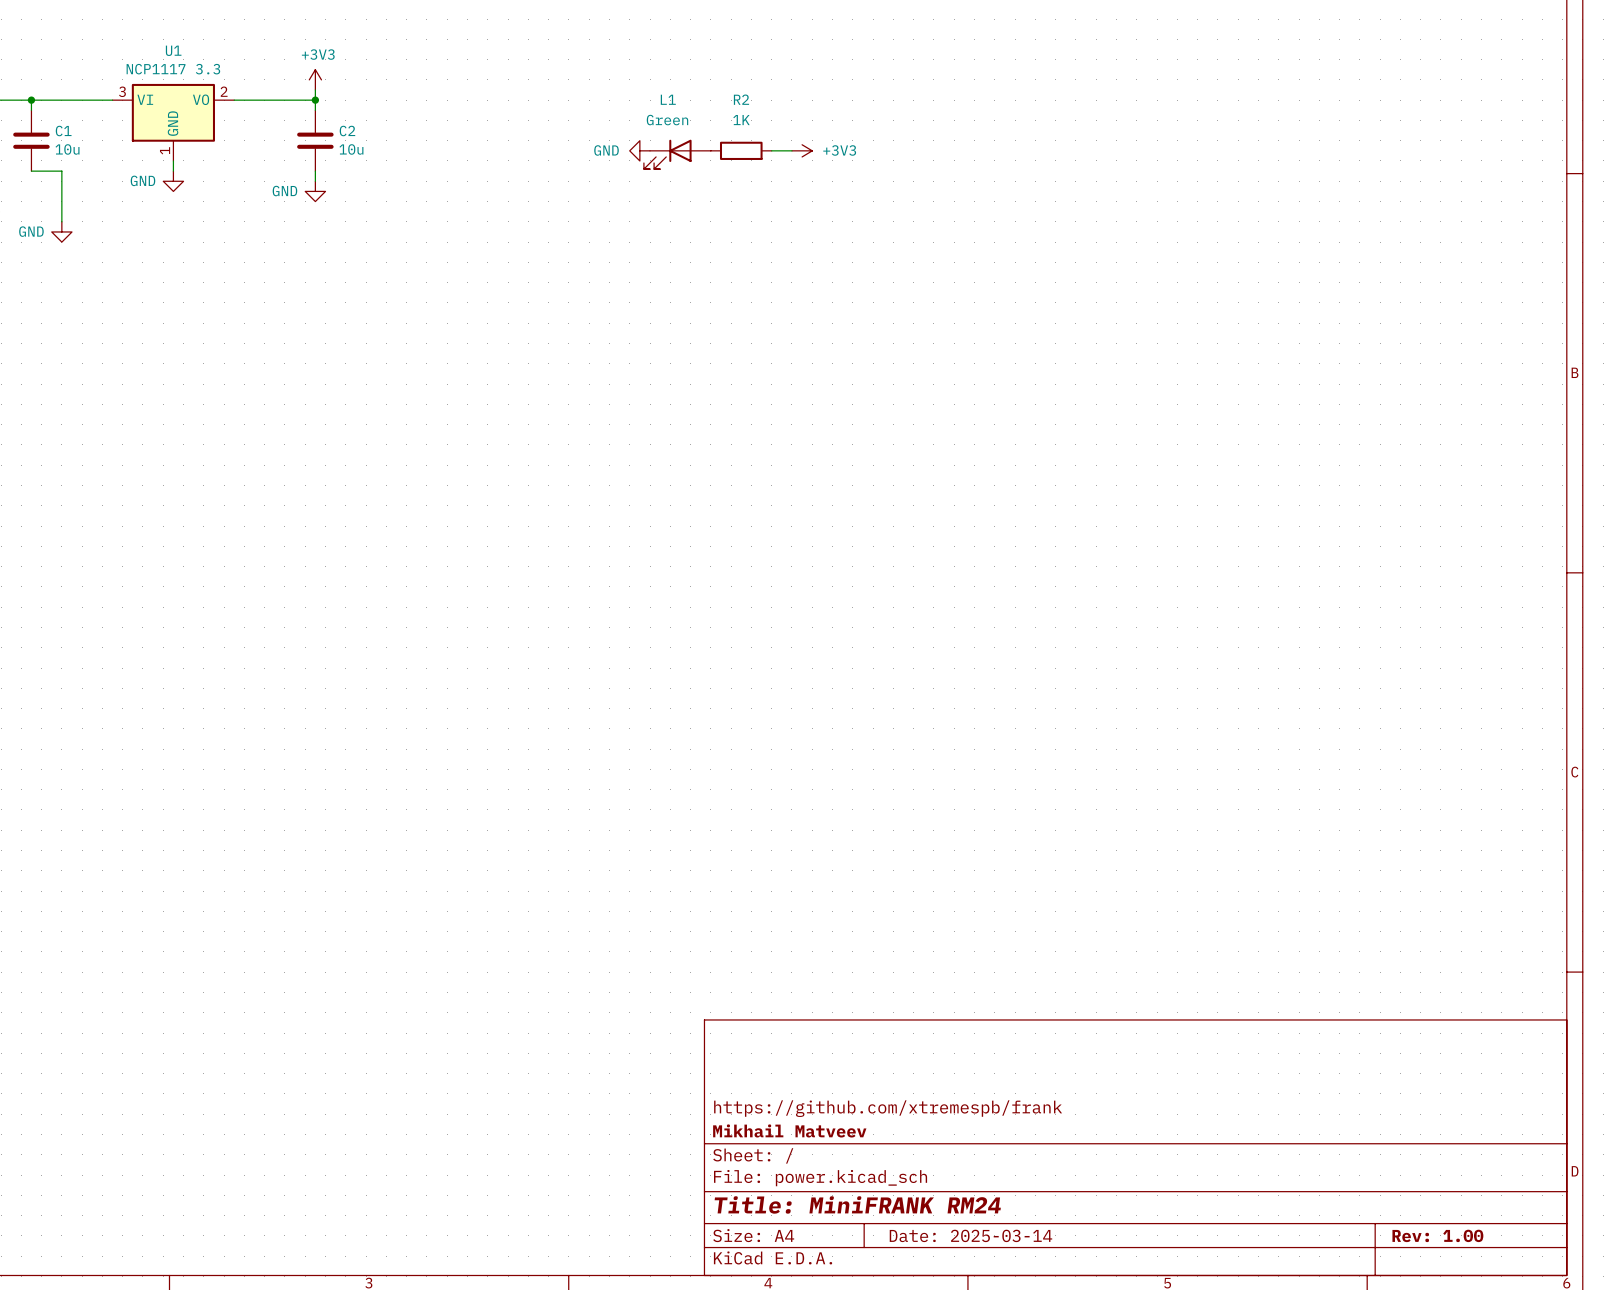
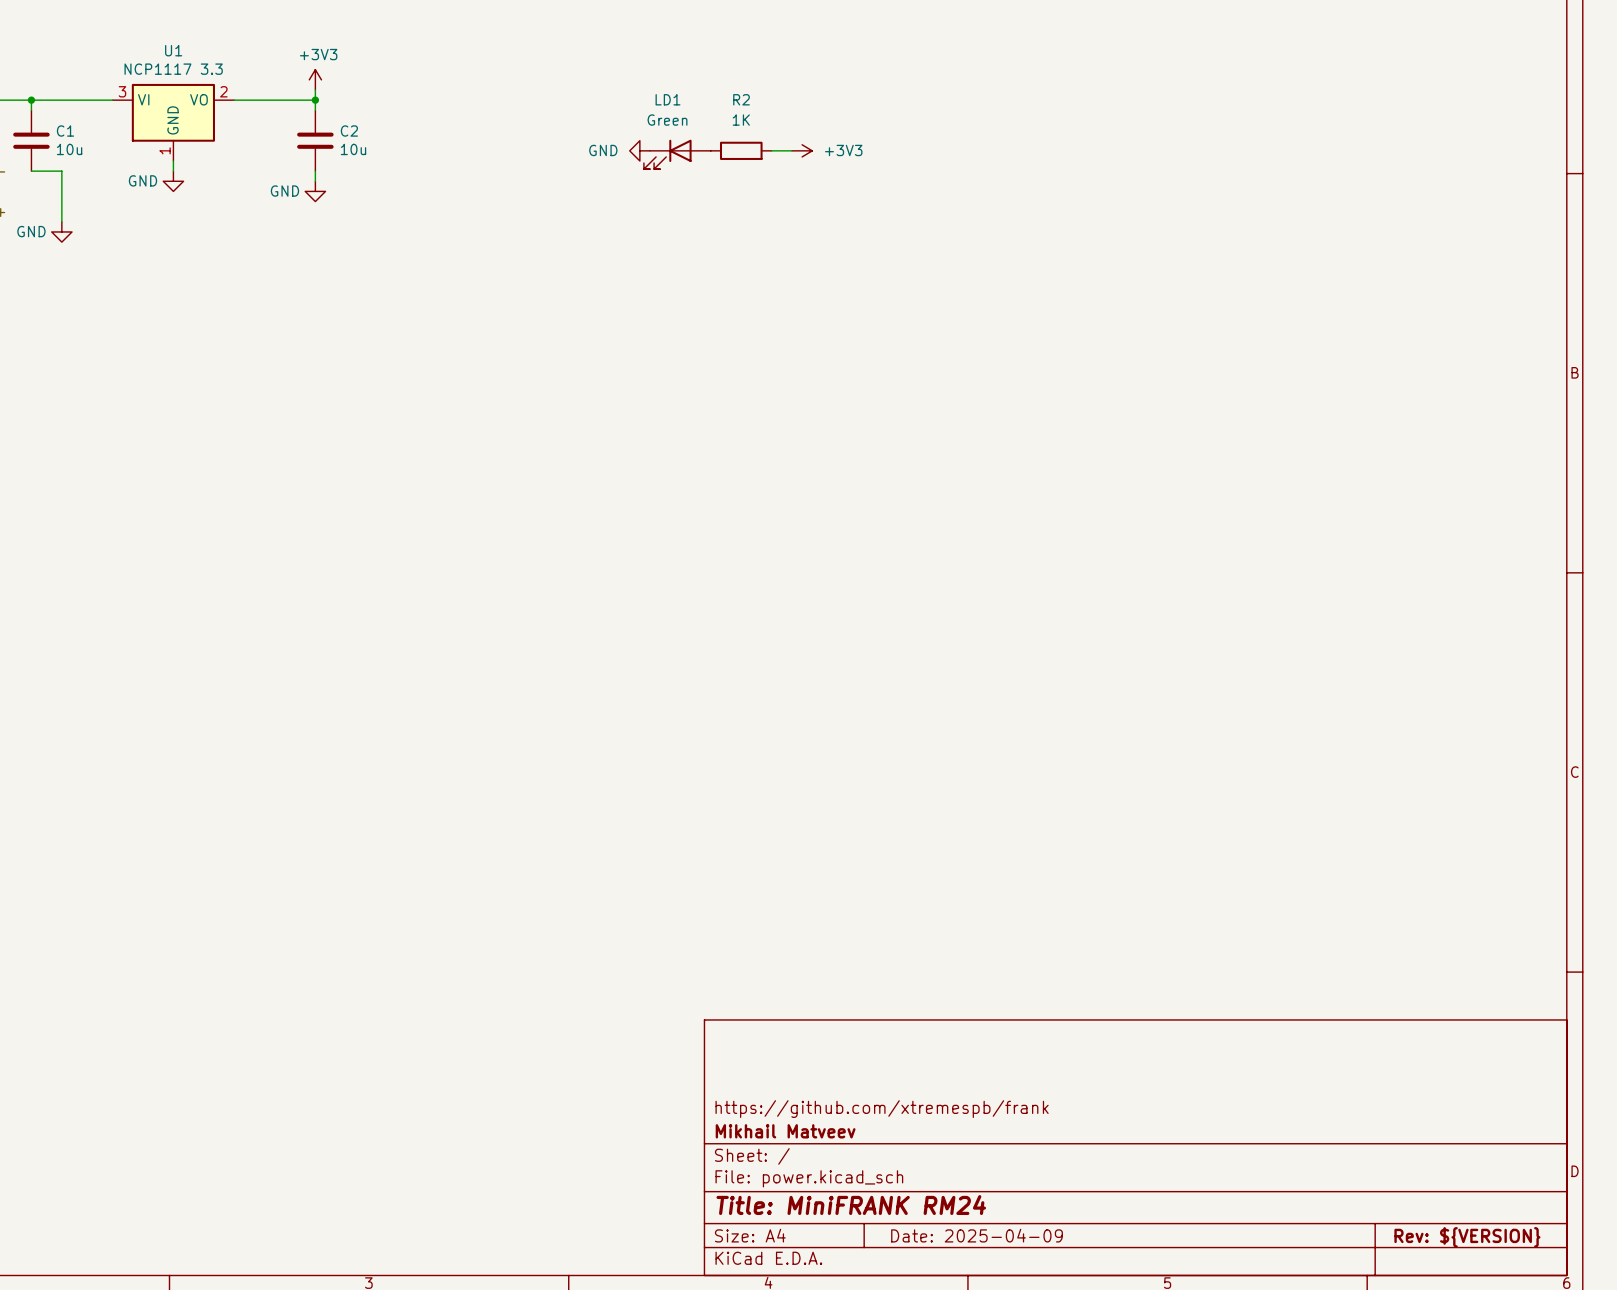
L1 name: L1 (668, 99) -> LD1 (668, 99)
title block: Date: 2025-03-14 (970, 1235) -> Date: 2025-04-09 (977, 1235)
title block: Rev: 1.00 (1437, 1235) -> Rev: ${VERSION} (1467, 1237)

